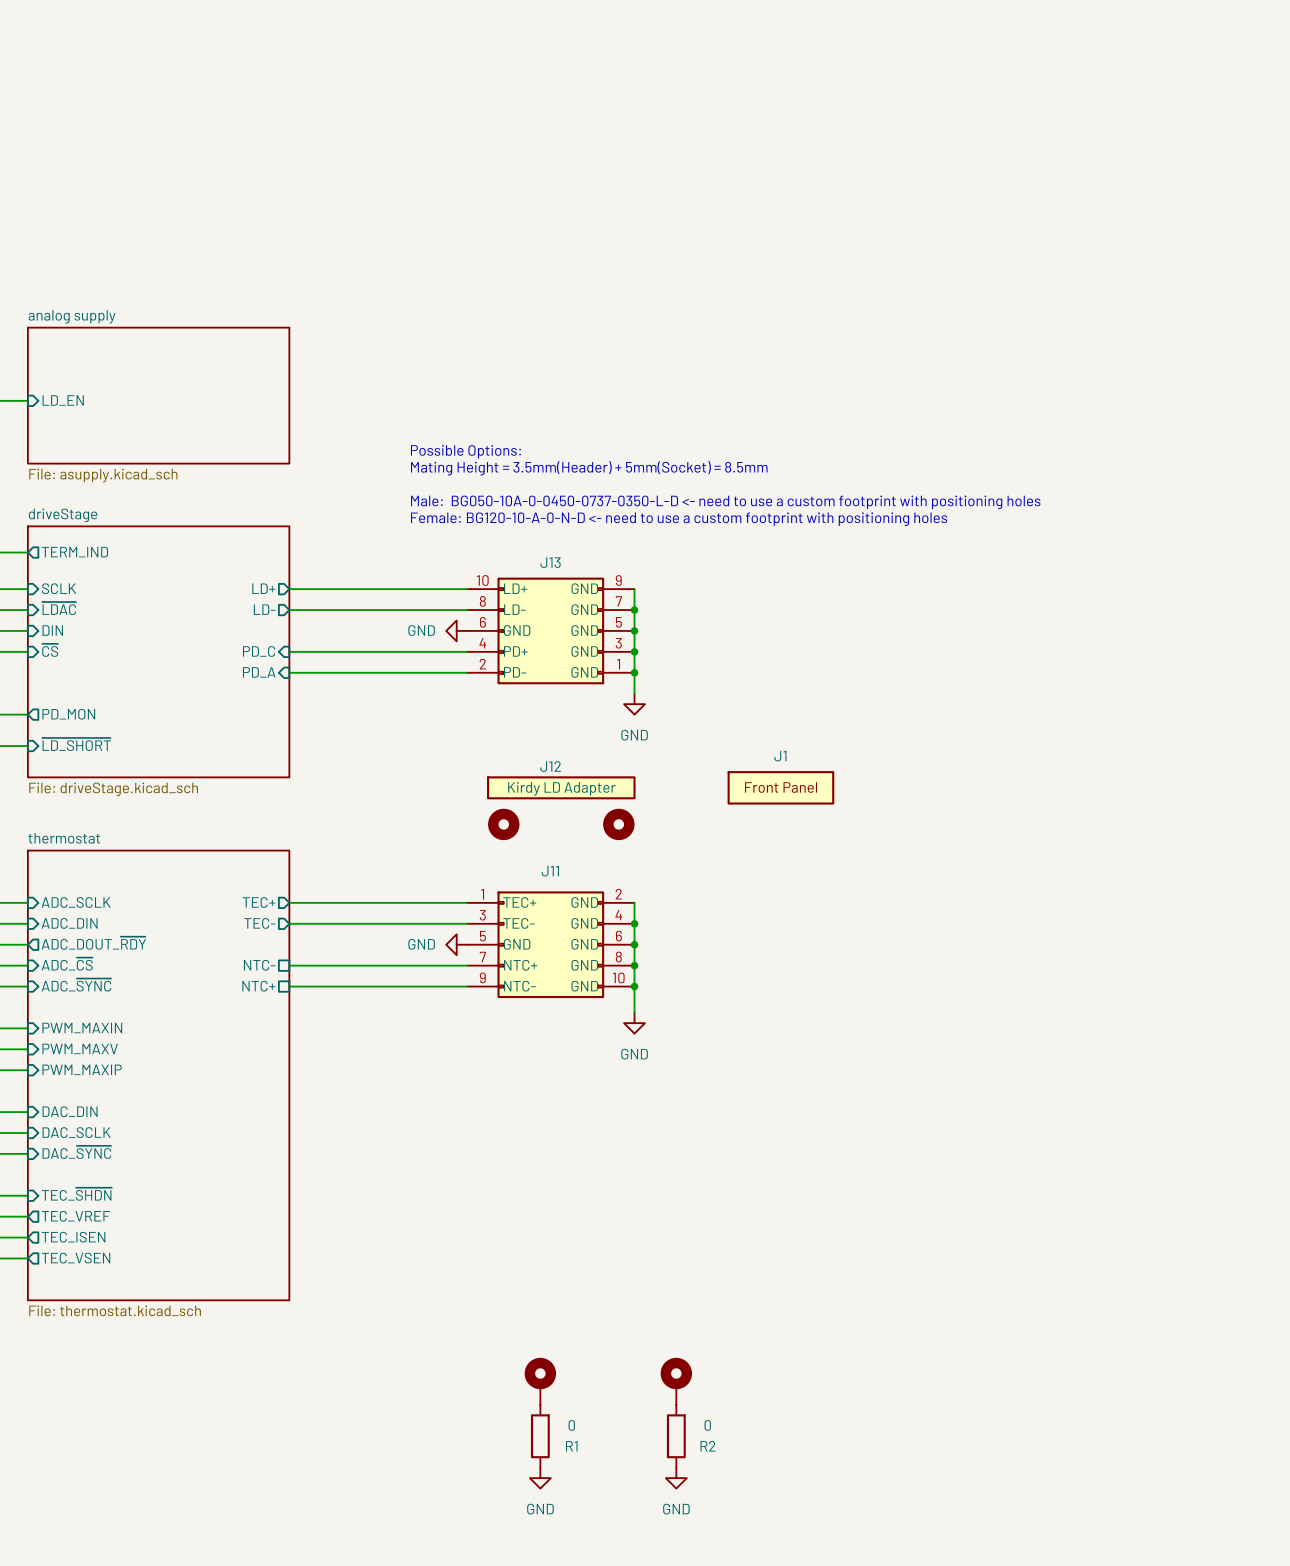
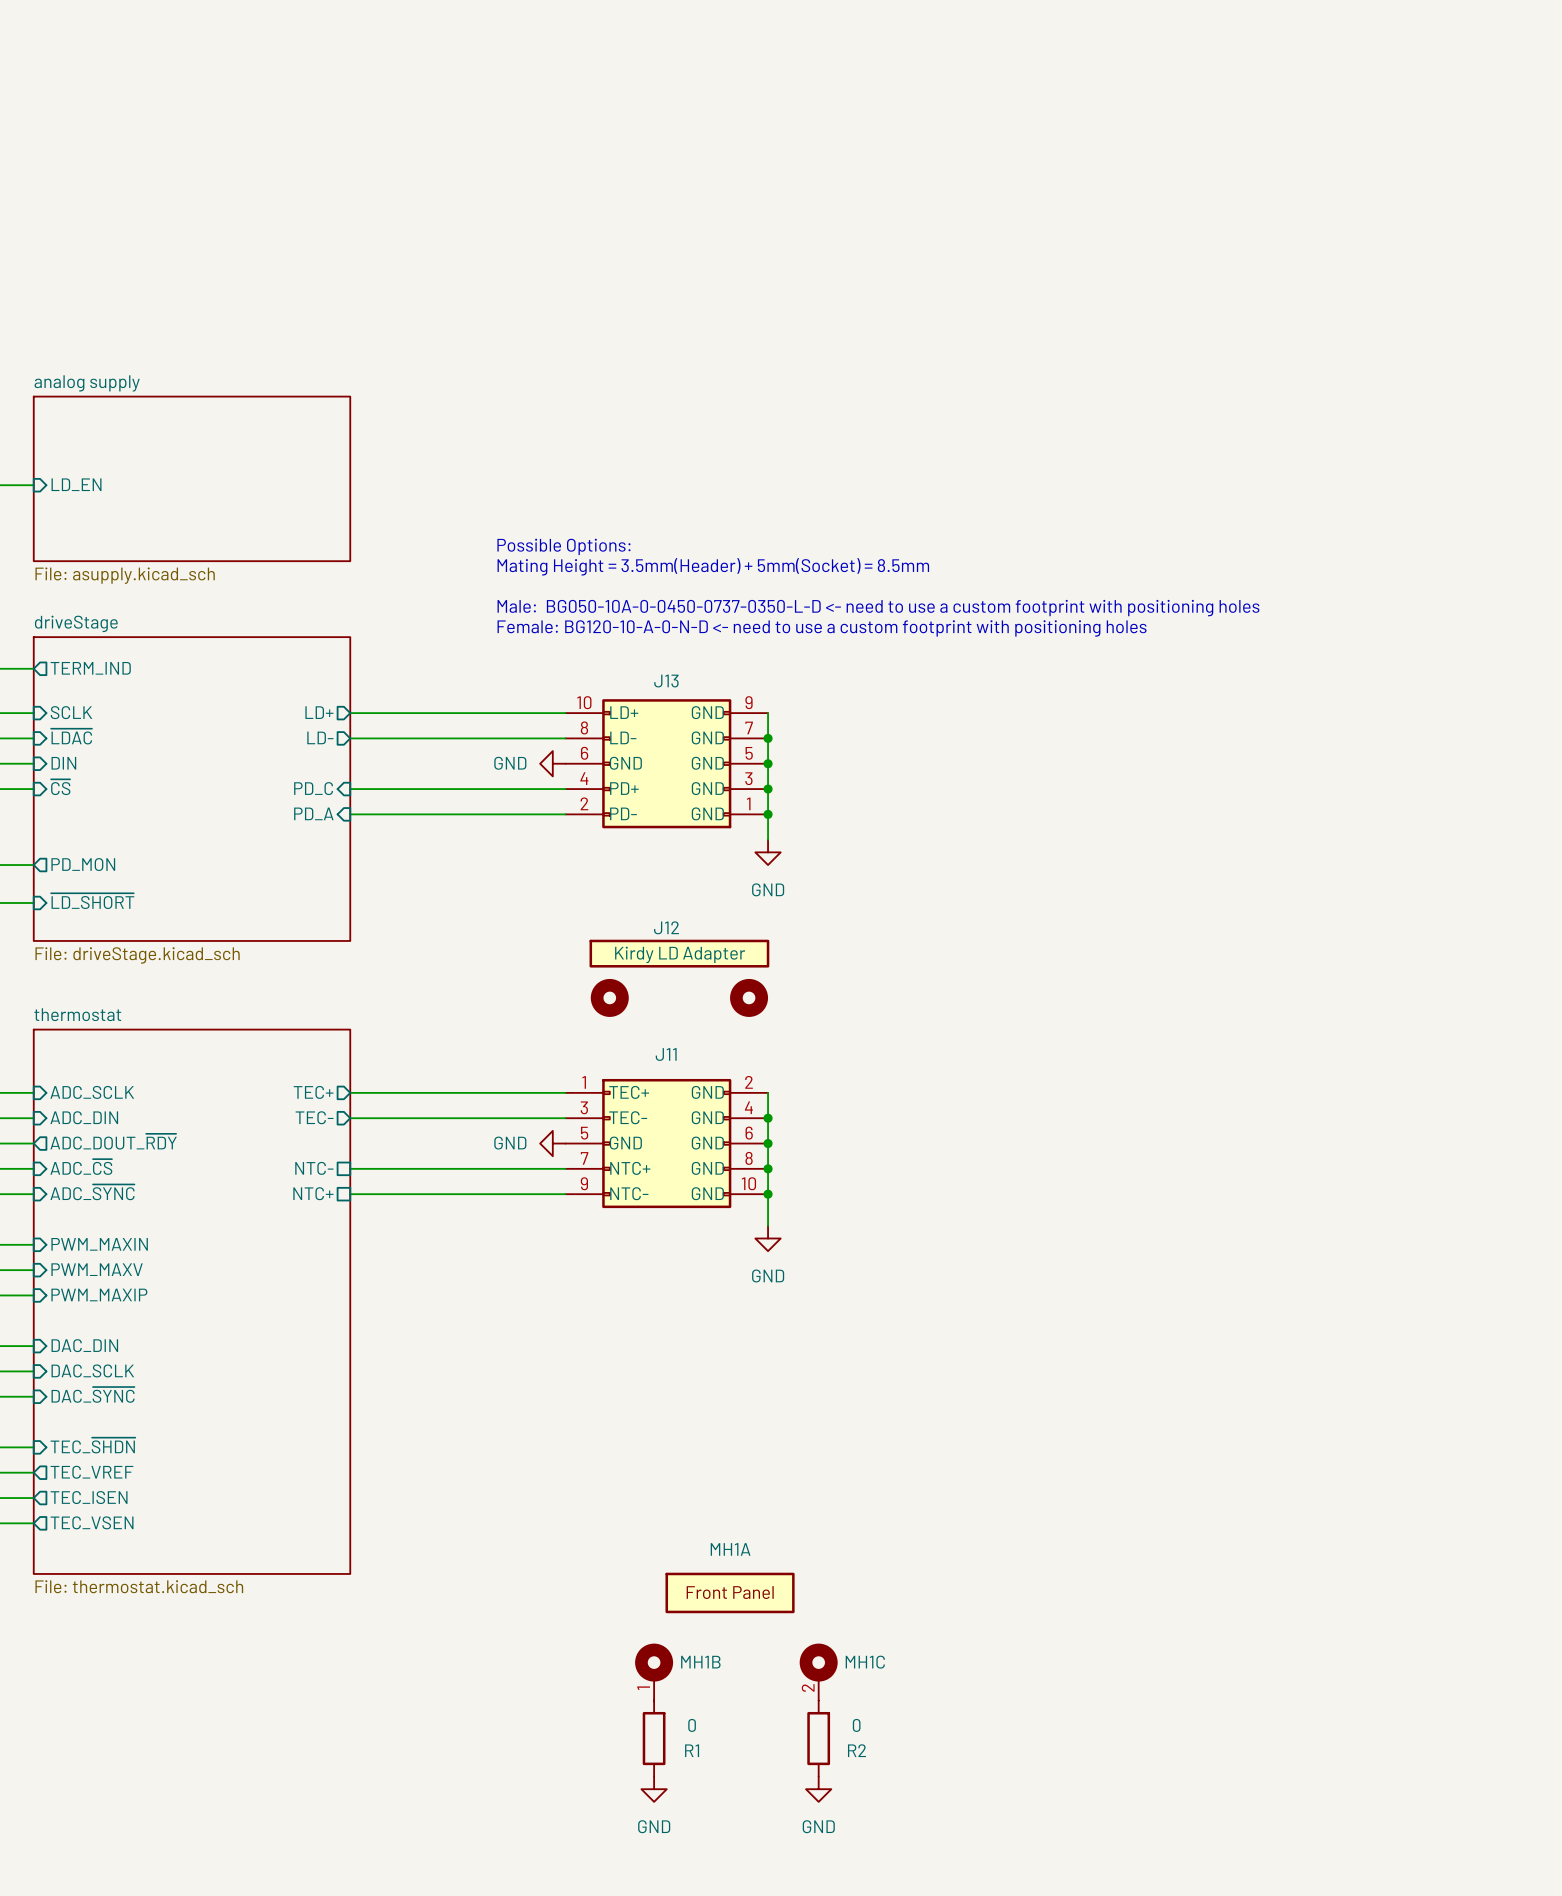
J1: (780, 787) -> none
MH1A: none -> (730, 1592)
MH1B name: none -> MH1B (700, 1662)
MH1C name: none -> MH1C (865, 1662)
MH1B pin number: none -> 1 (643, 1688)
MH1C pin number: none -> 2 (808, 1687)

